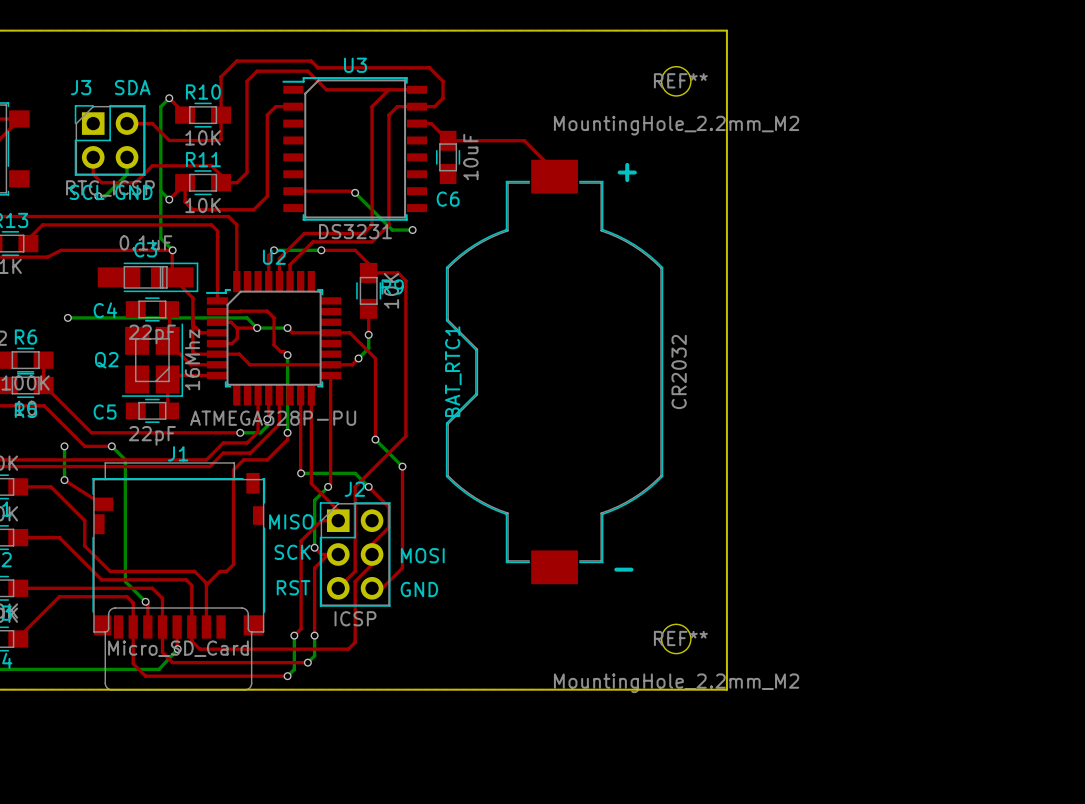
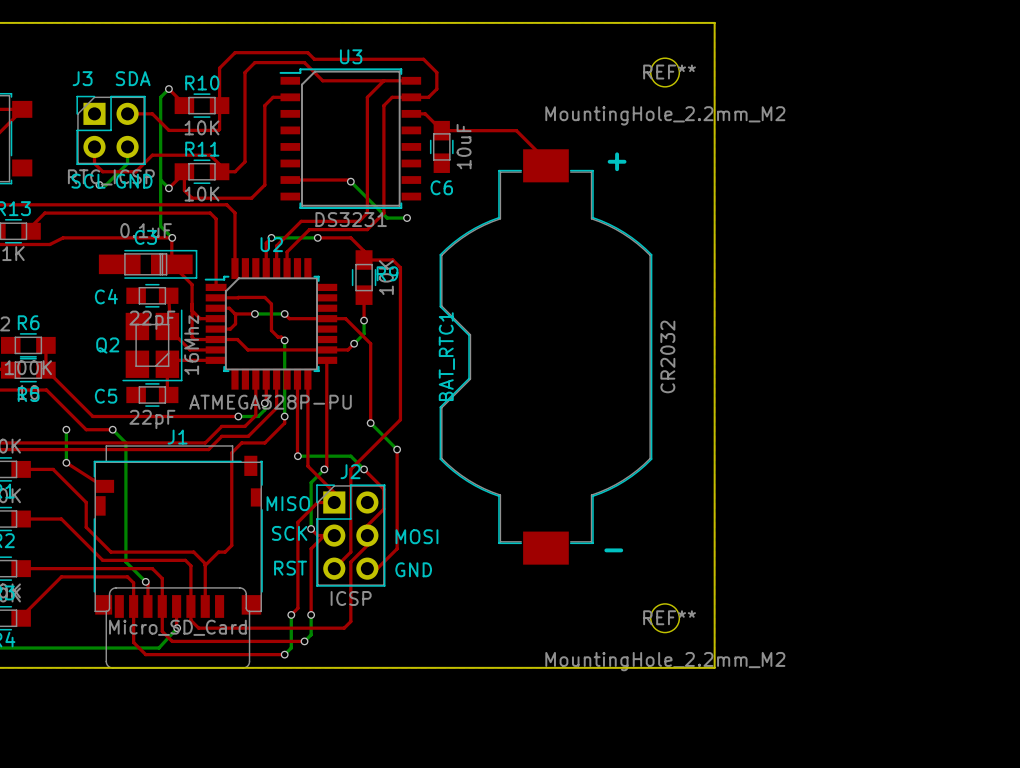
bottom track: (67, 317) (247, 317) (257, 328) -> none
via: (67, 317) -> none

